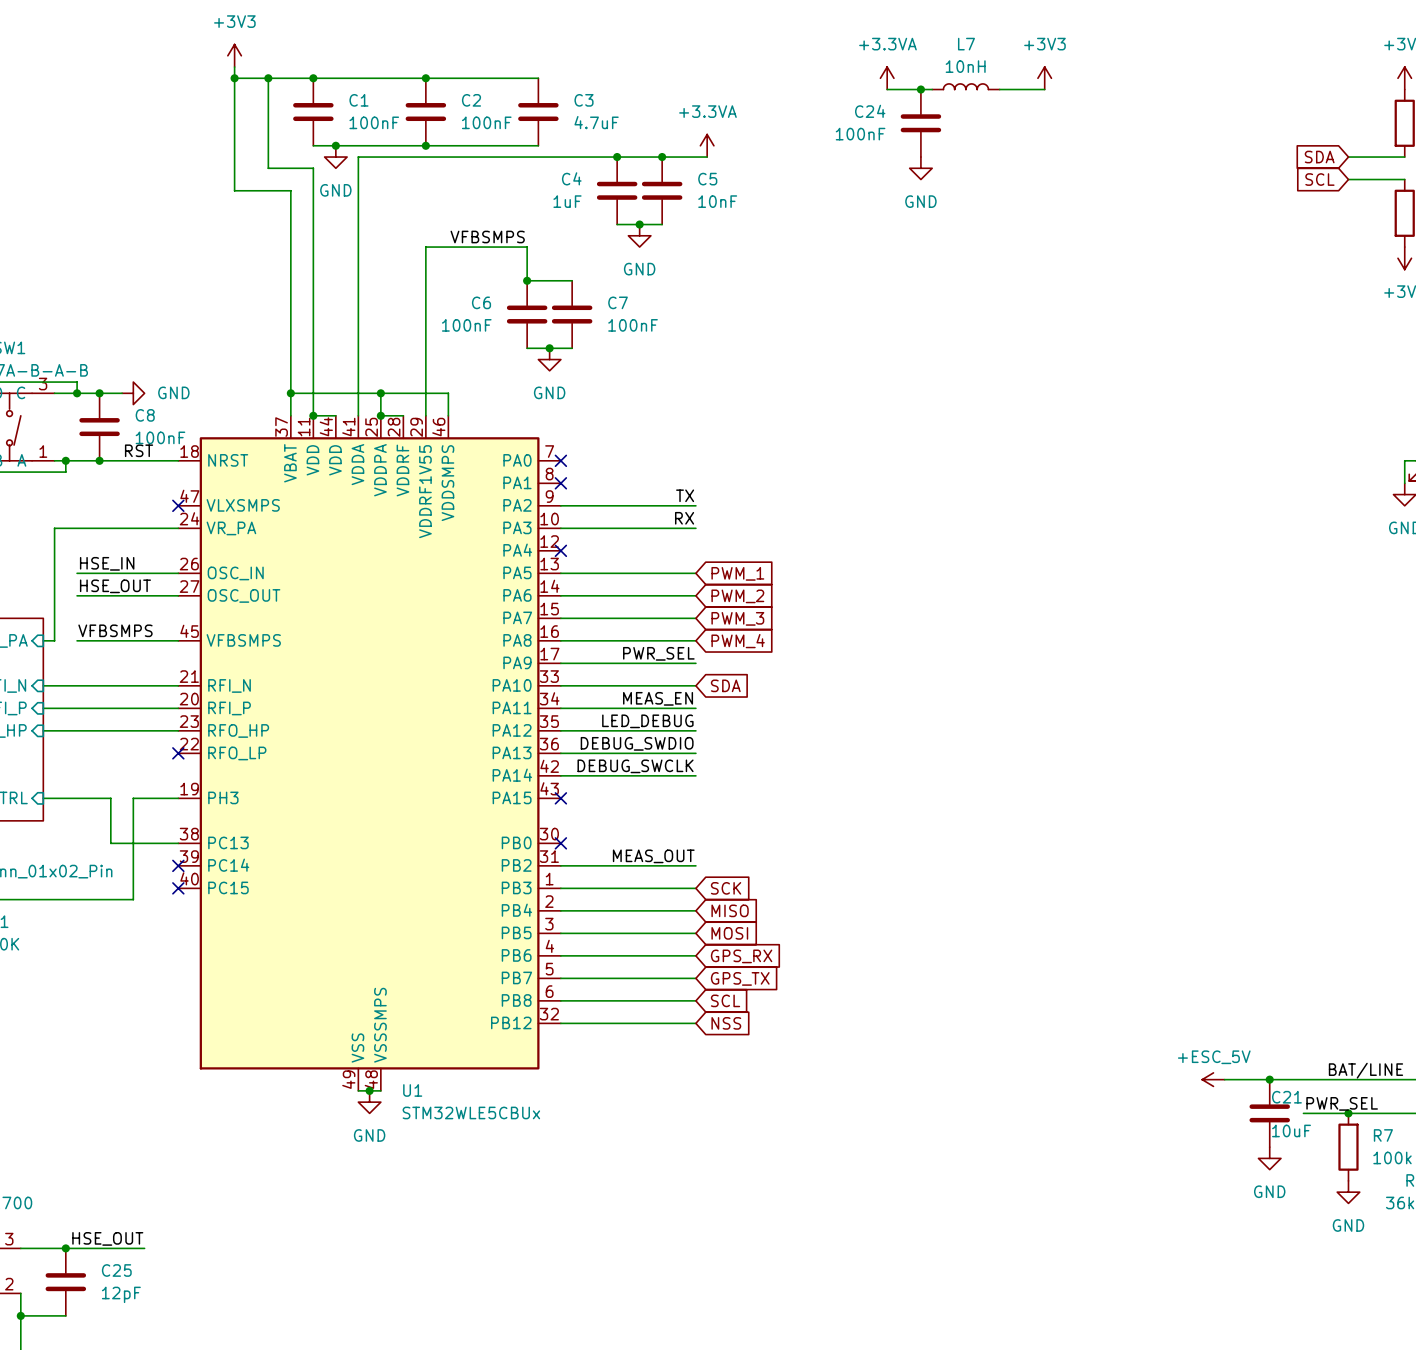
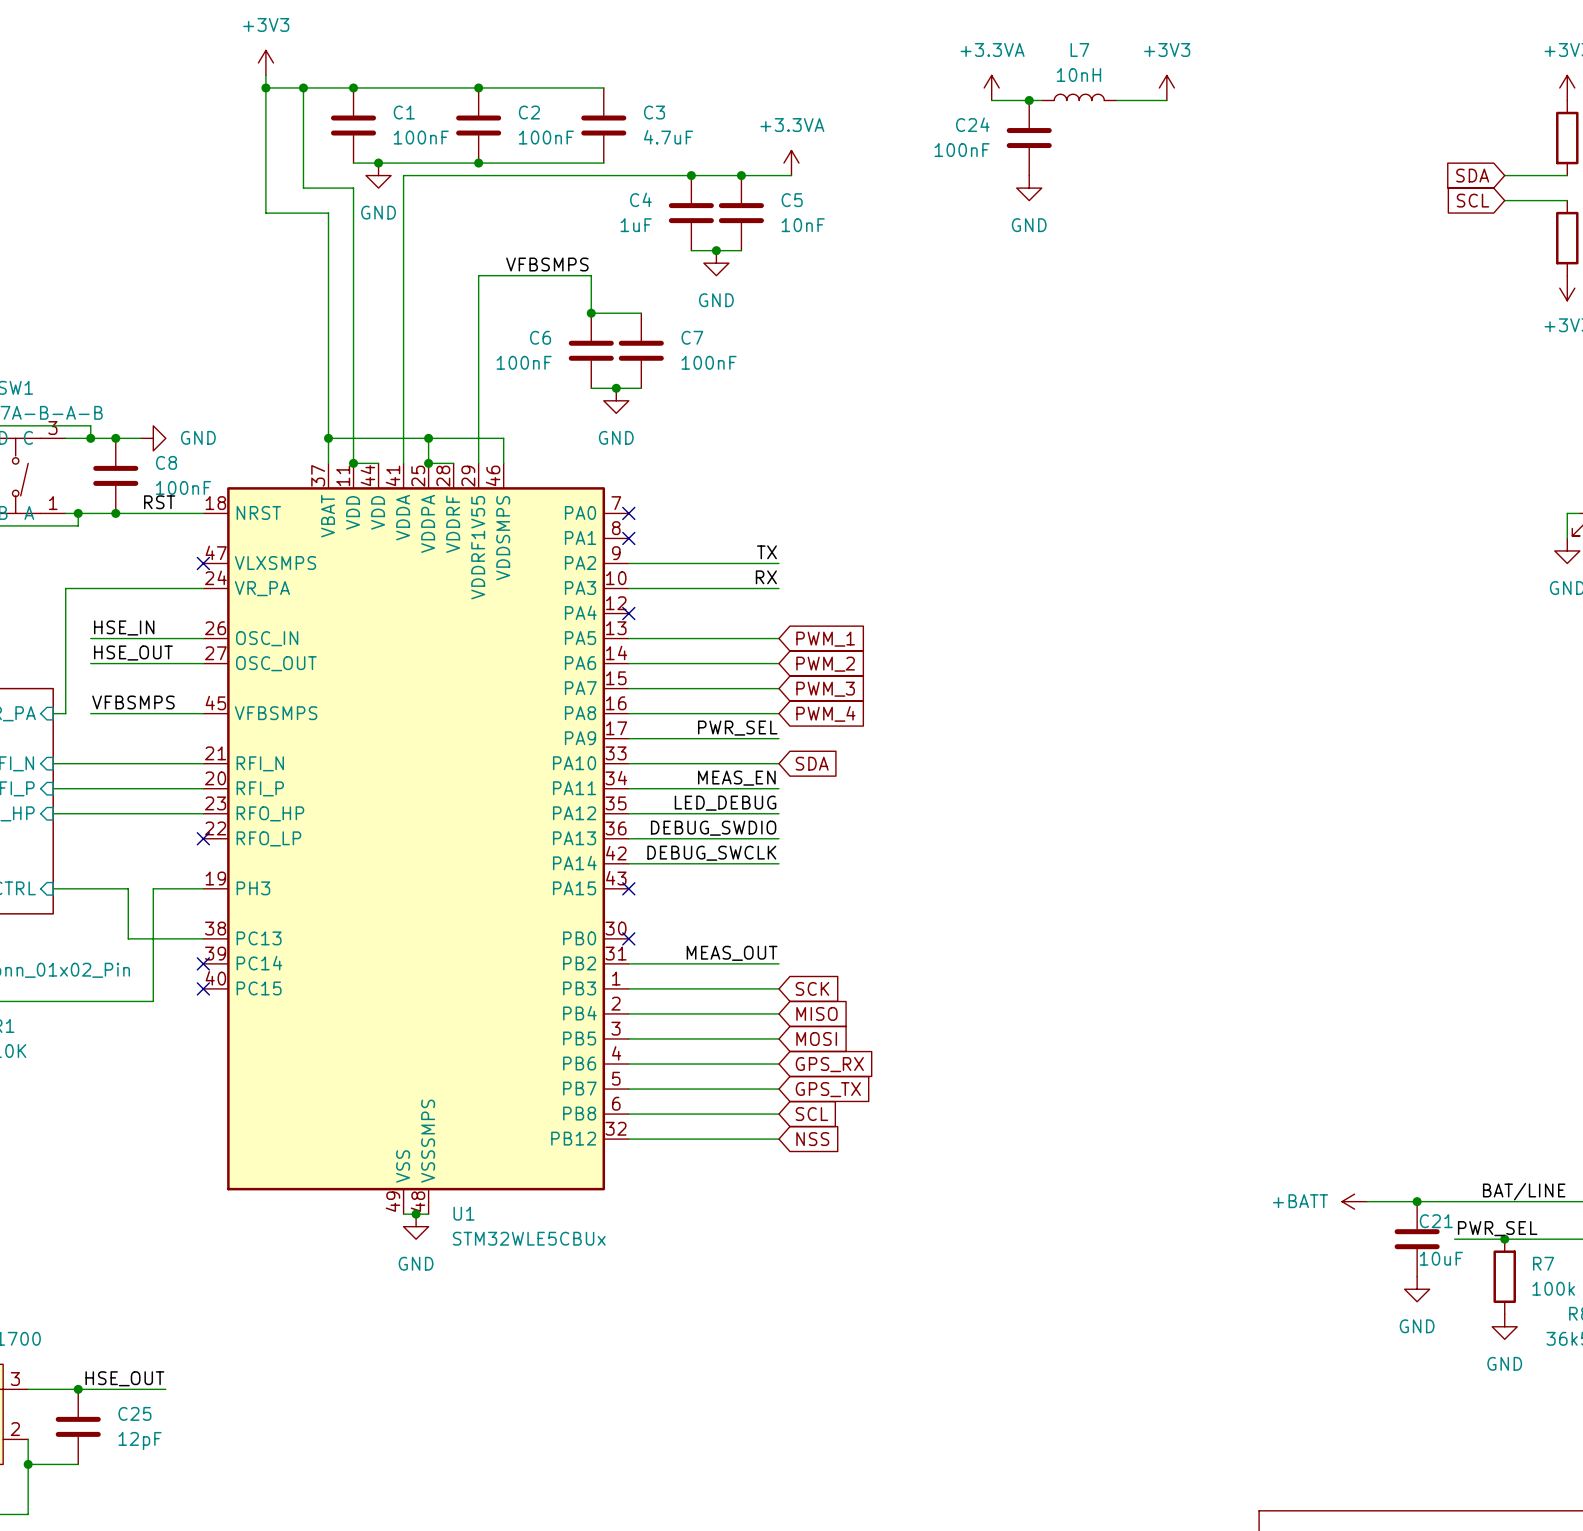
power symbol: +ESC_5V (1213, 1079) -> +BATT (1354, 1201)

